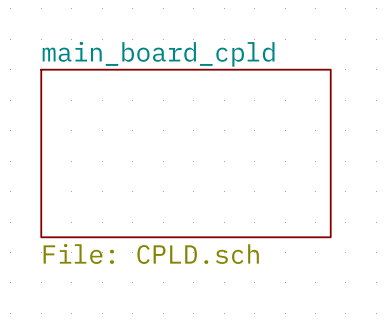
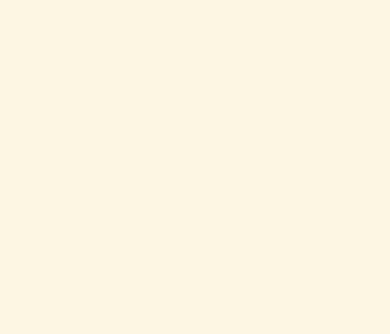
sheet main_board_cpld: File: CPLD.sch (185, 153) -> none

